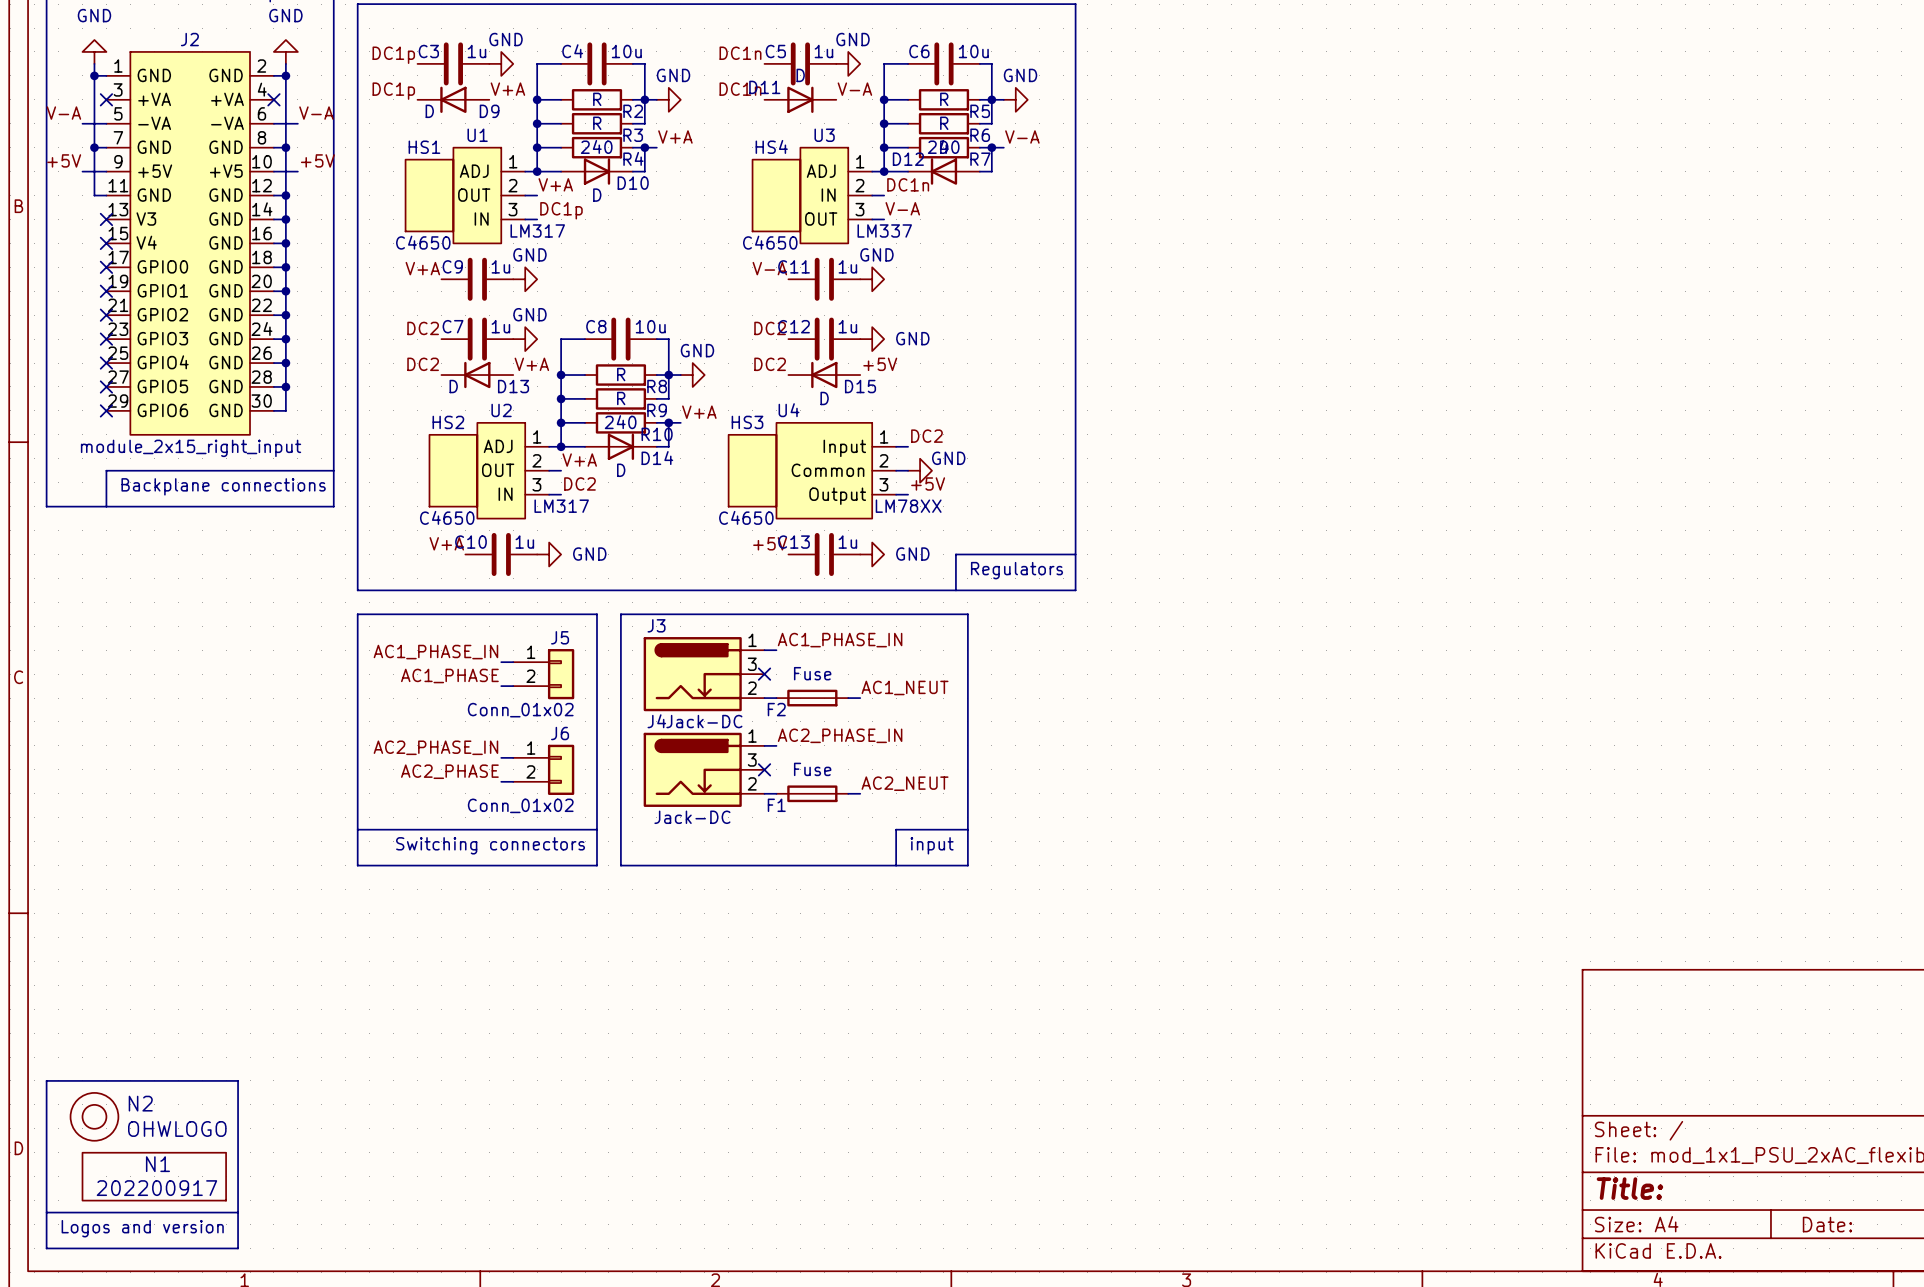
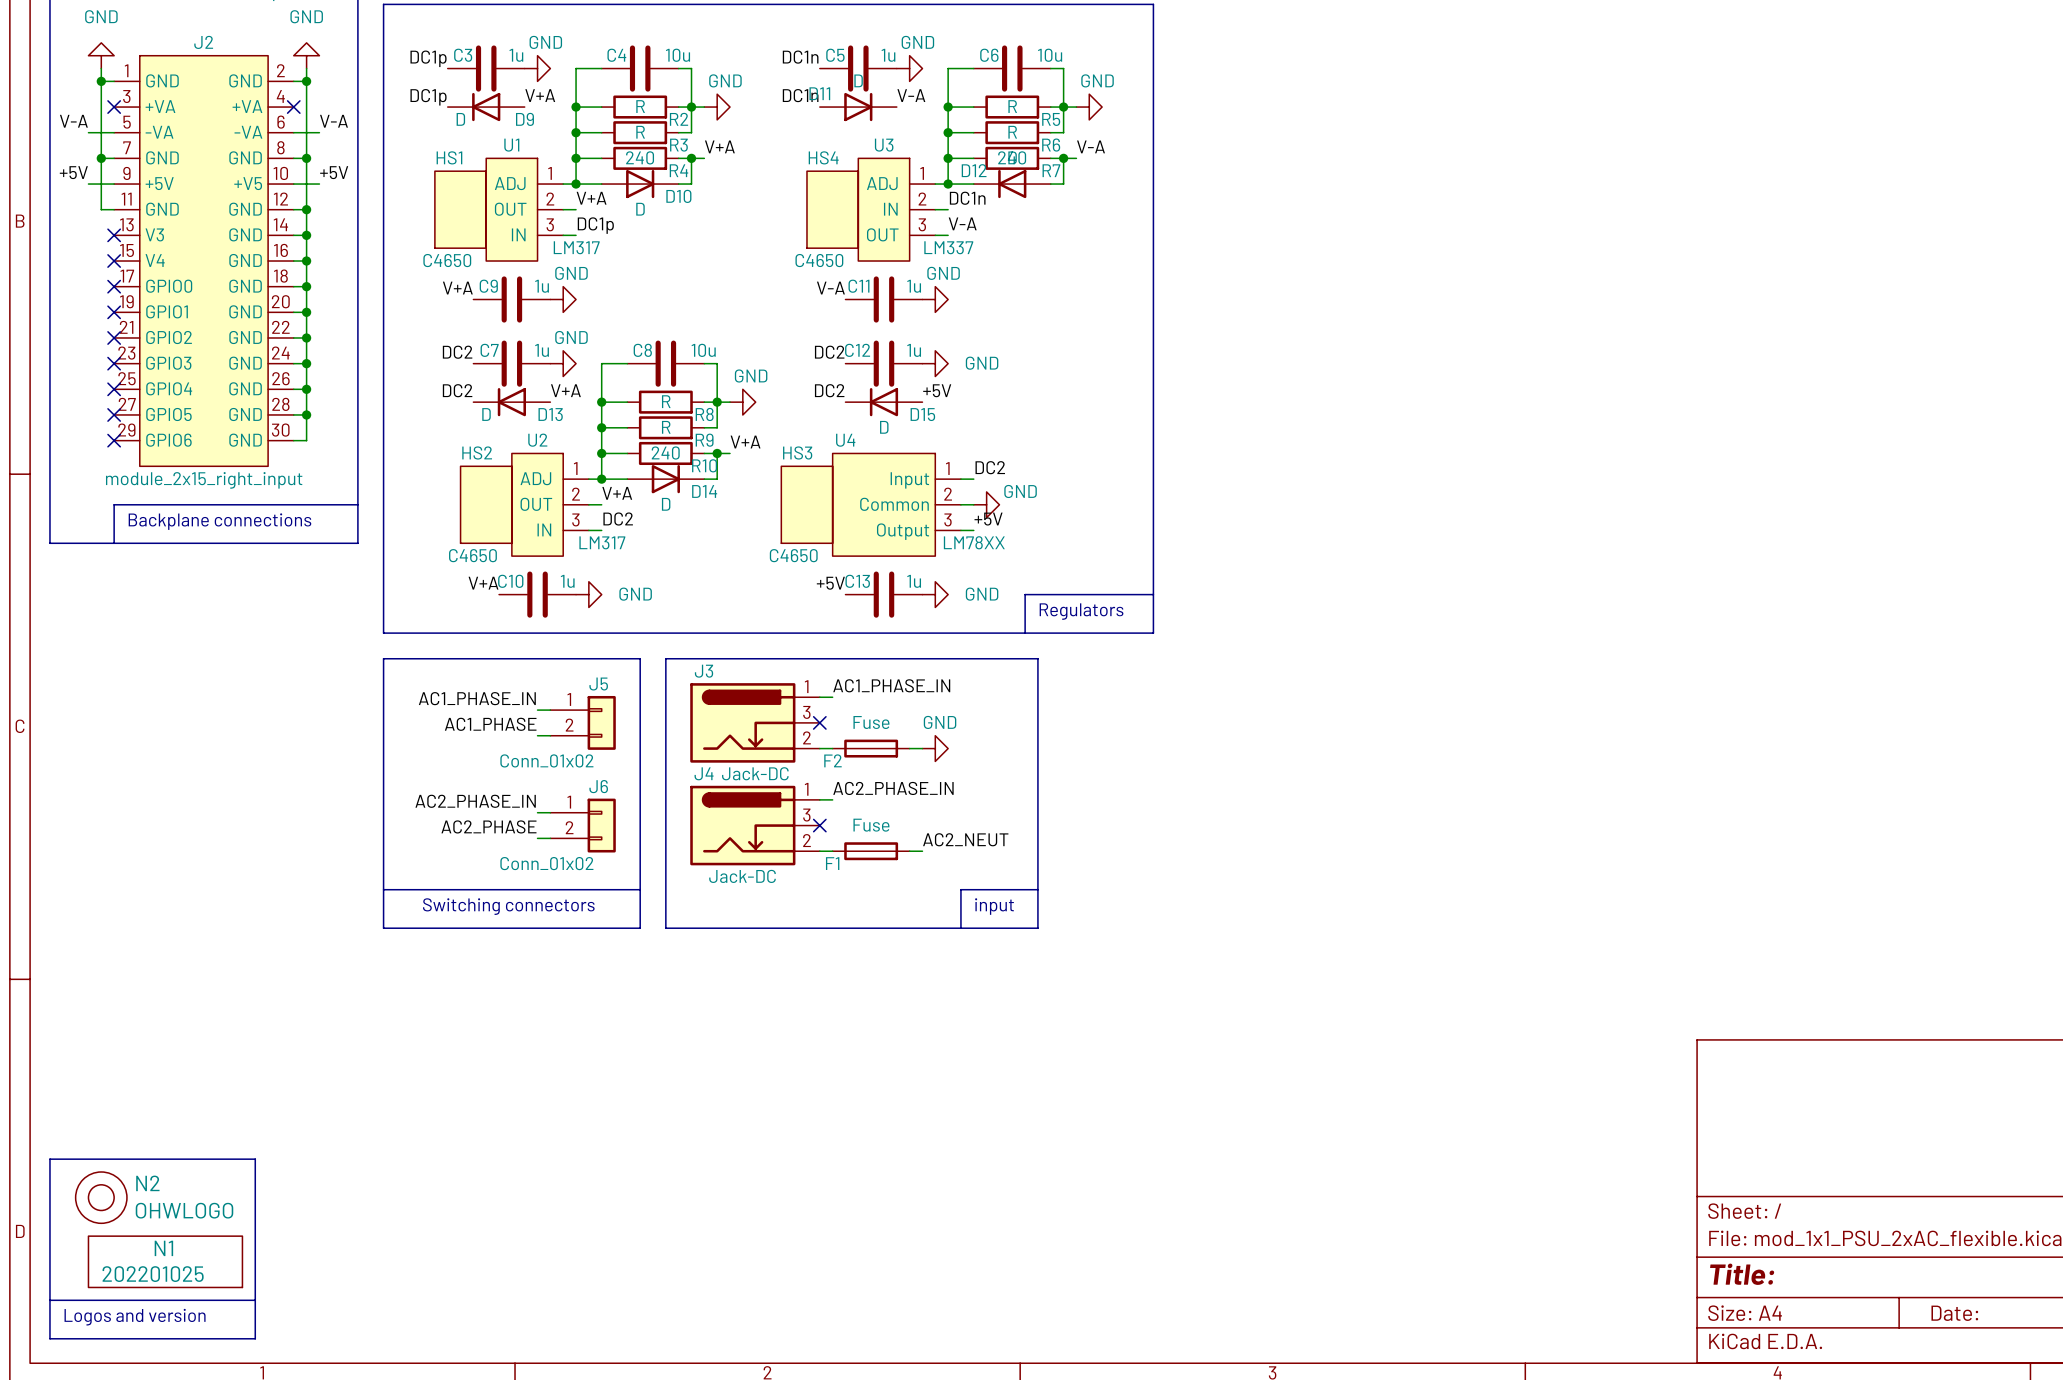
label: AC1_NEUT (905, 687) -> none
power symbol: none -> GND (935, 748)
N1 value: 202200917 (156, 1188) -> 202201025 (153, 1274)

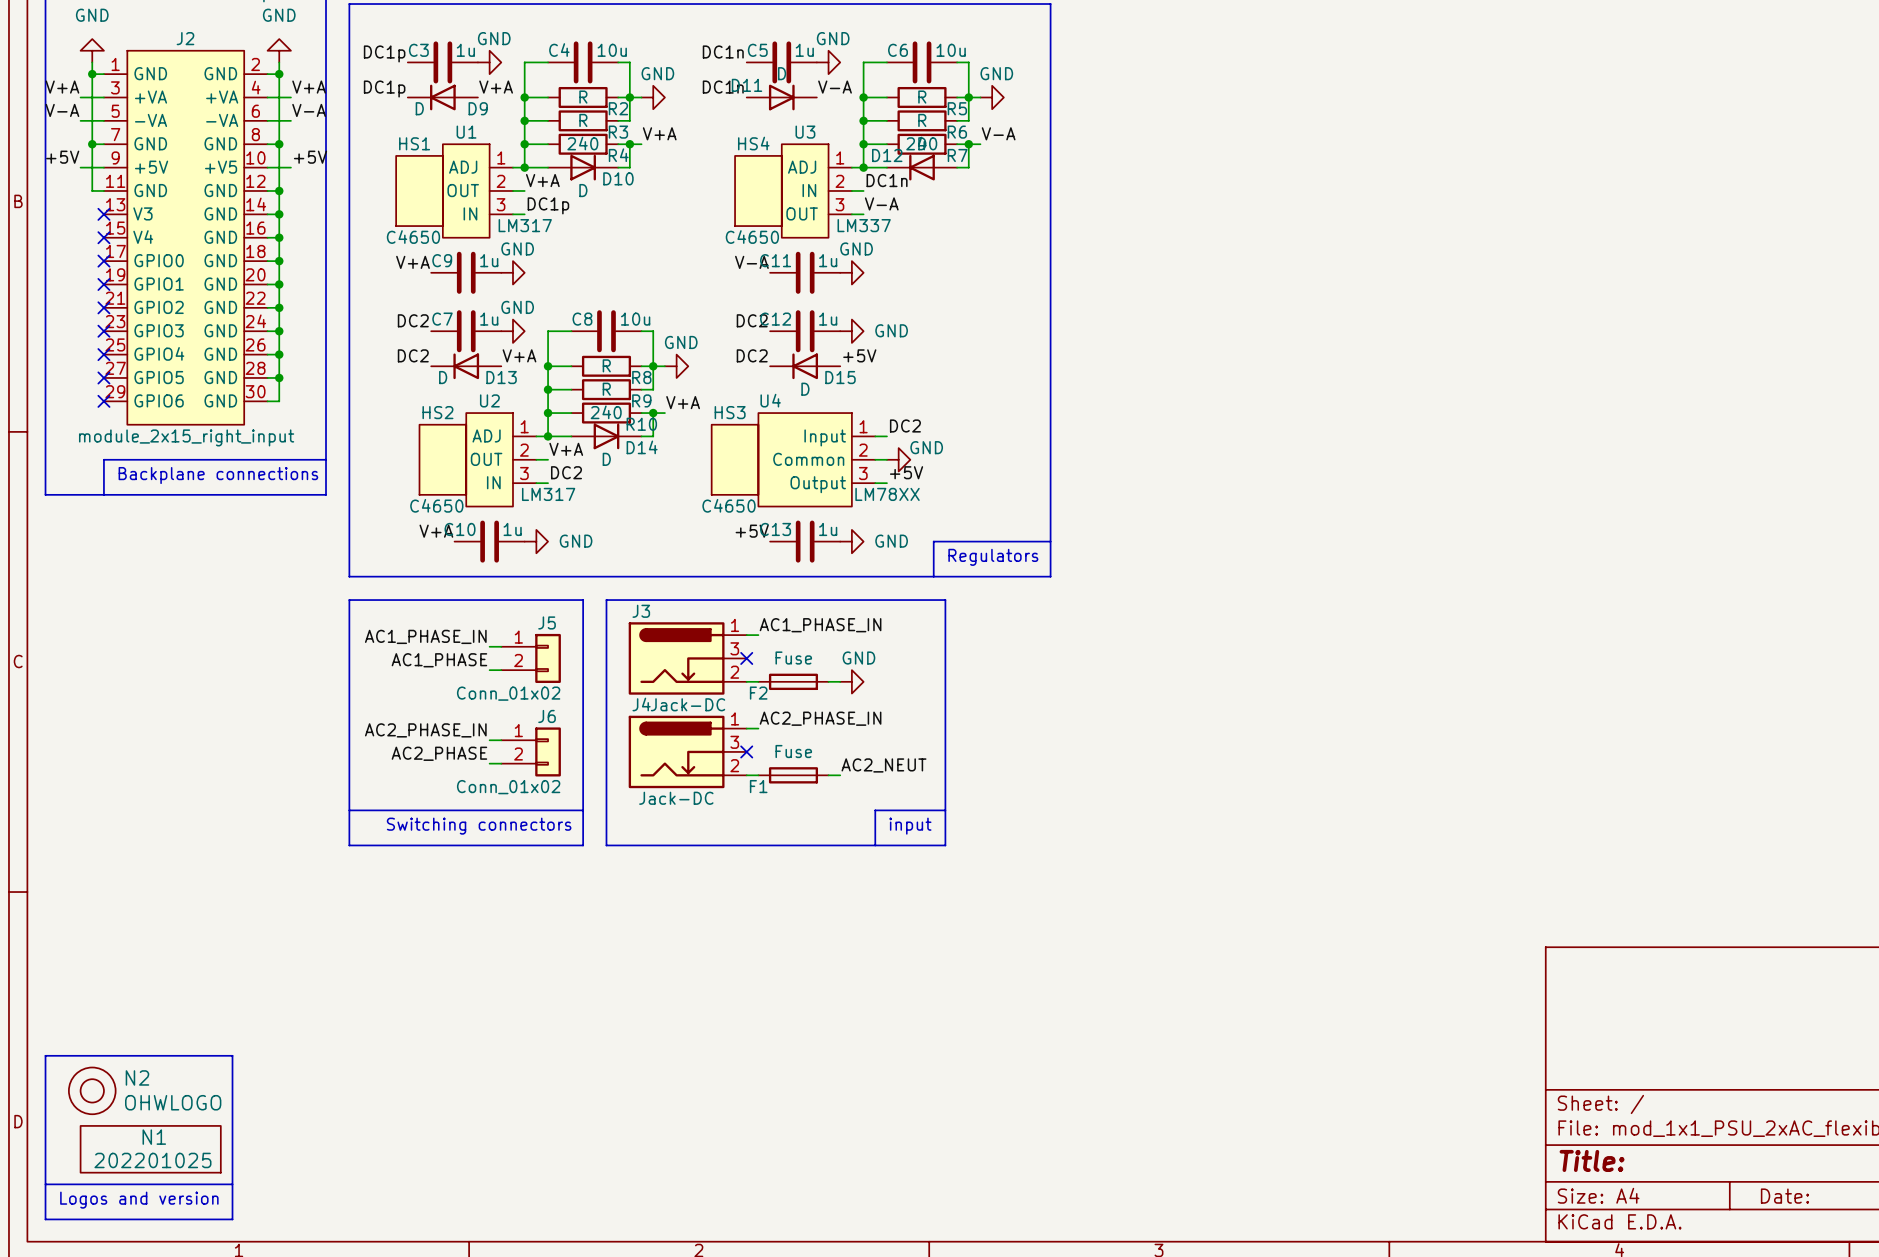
label: none -> V+A (62, 87)
label: none -> V+A (309, 87)
wire: none -> (80, 97) (103, 97)
no-connect mark: (114, 107) -> none
wire: none -> (267, 97) (290, 97)
no-connect mark: (293, 107) -> none

